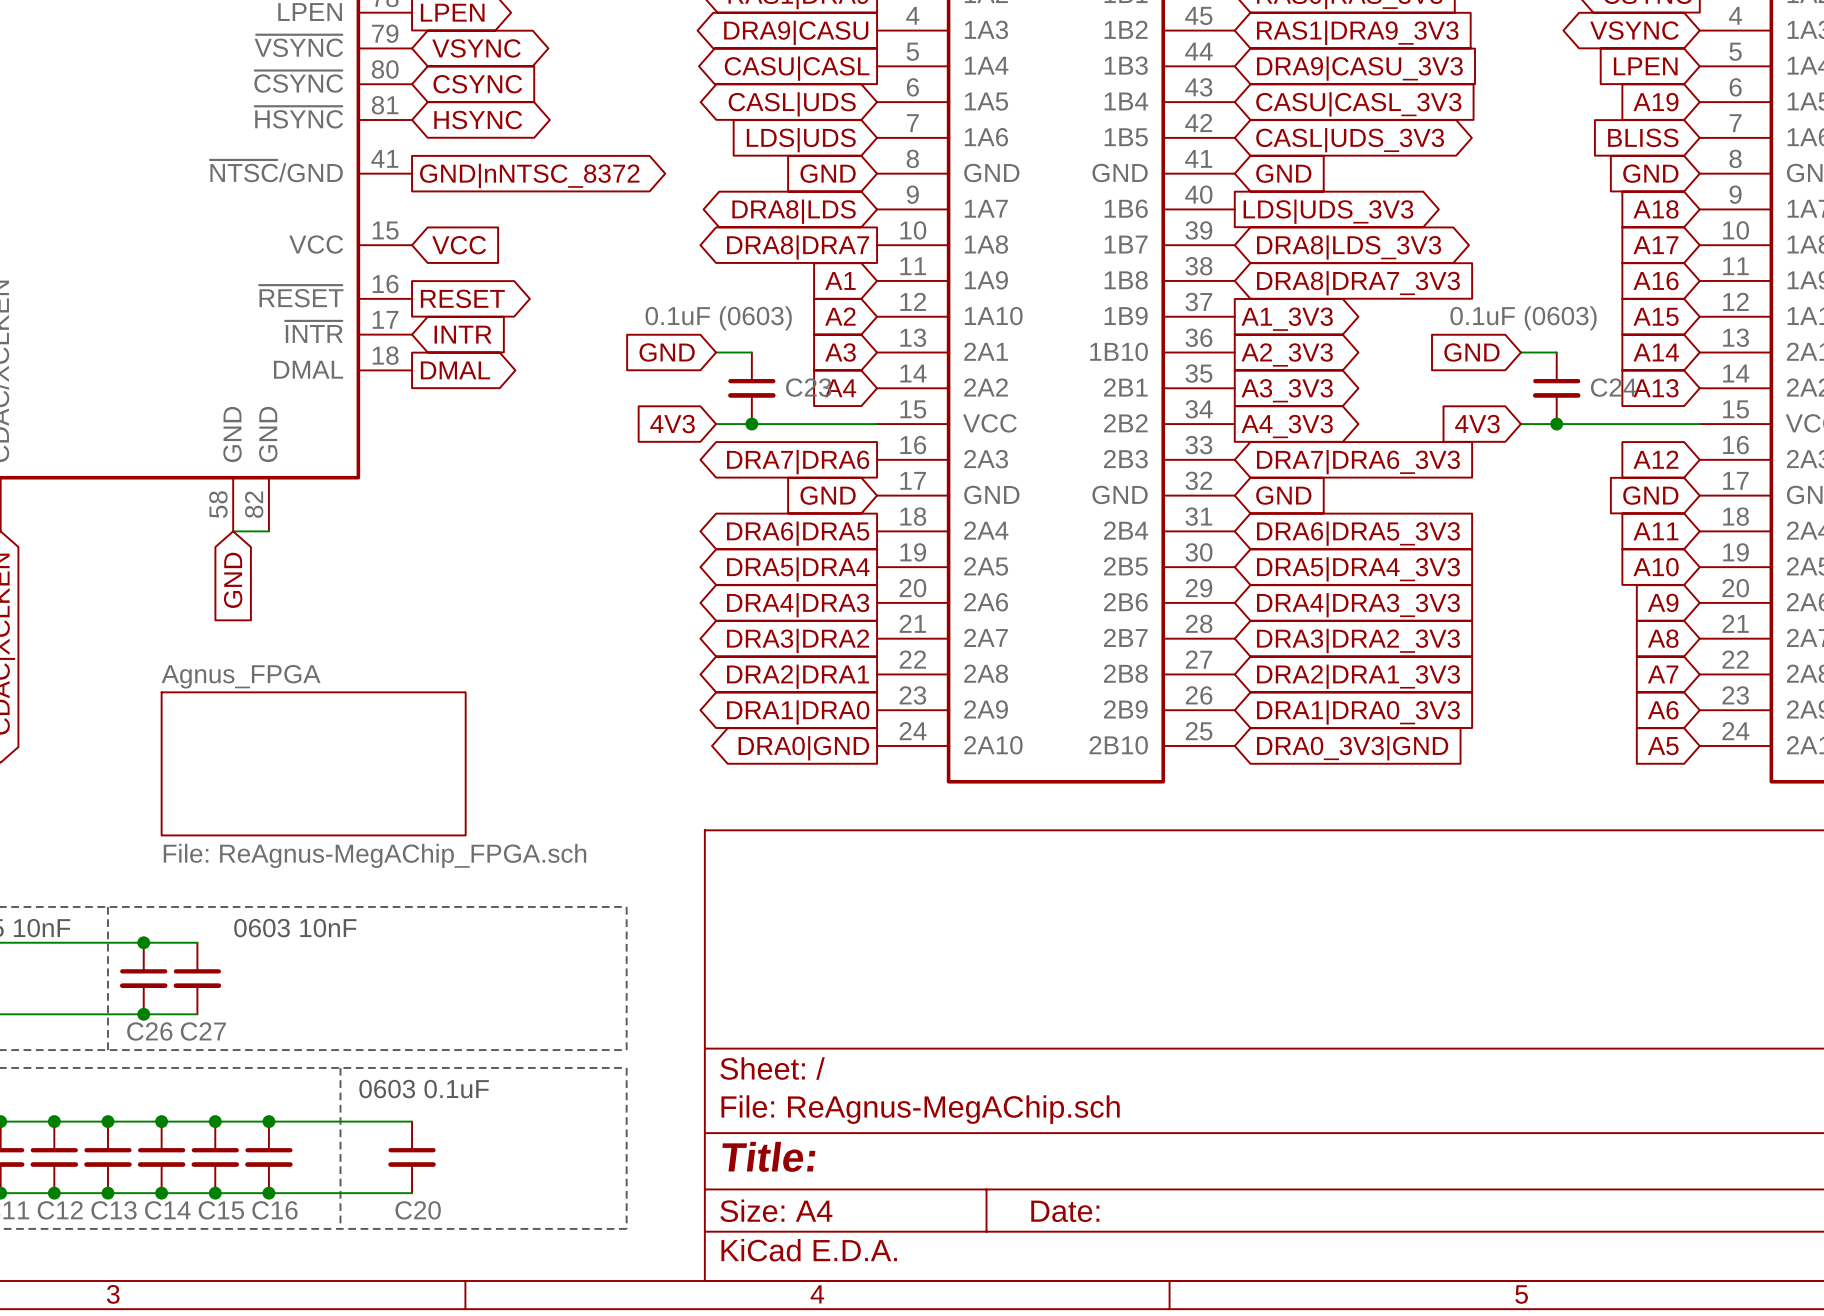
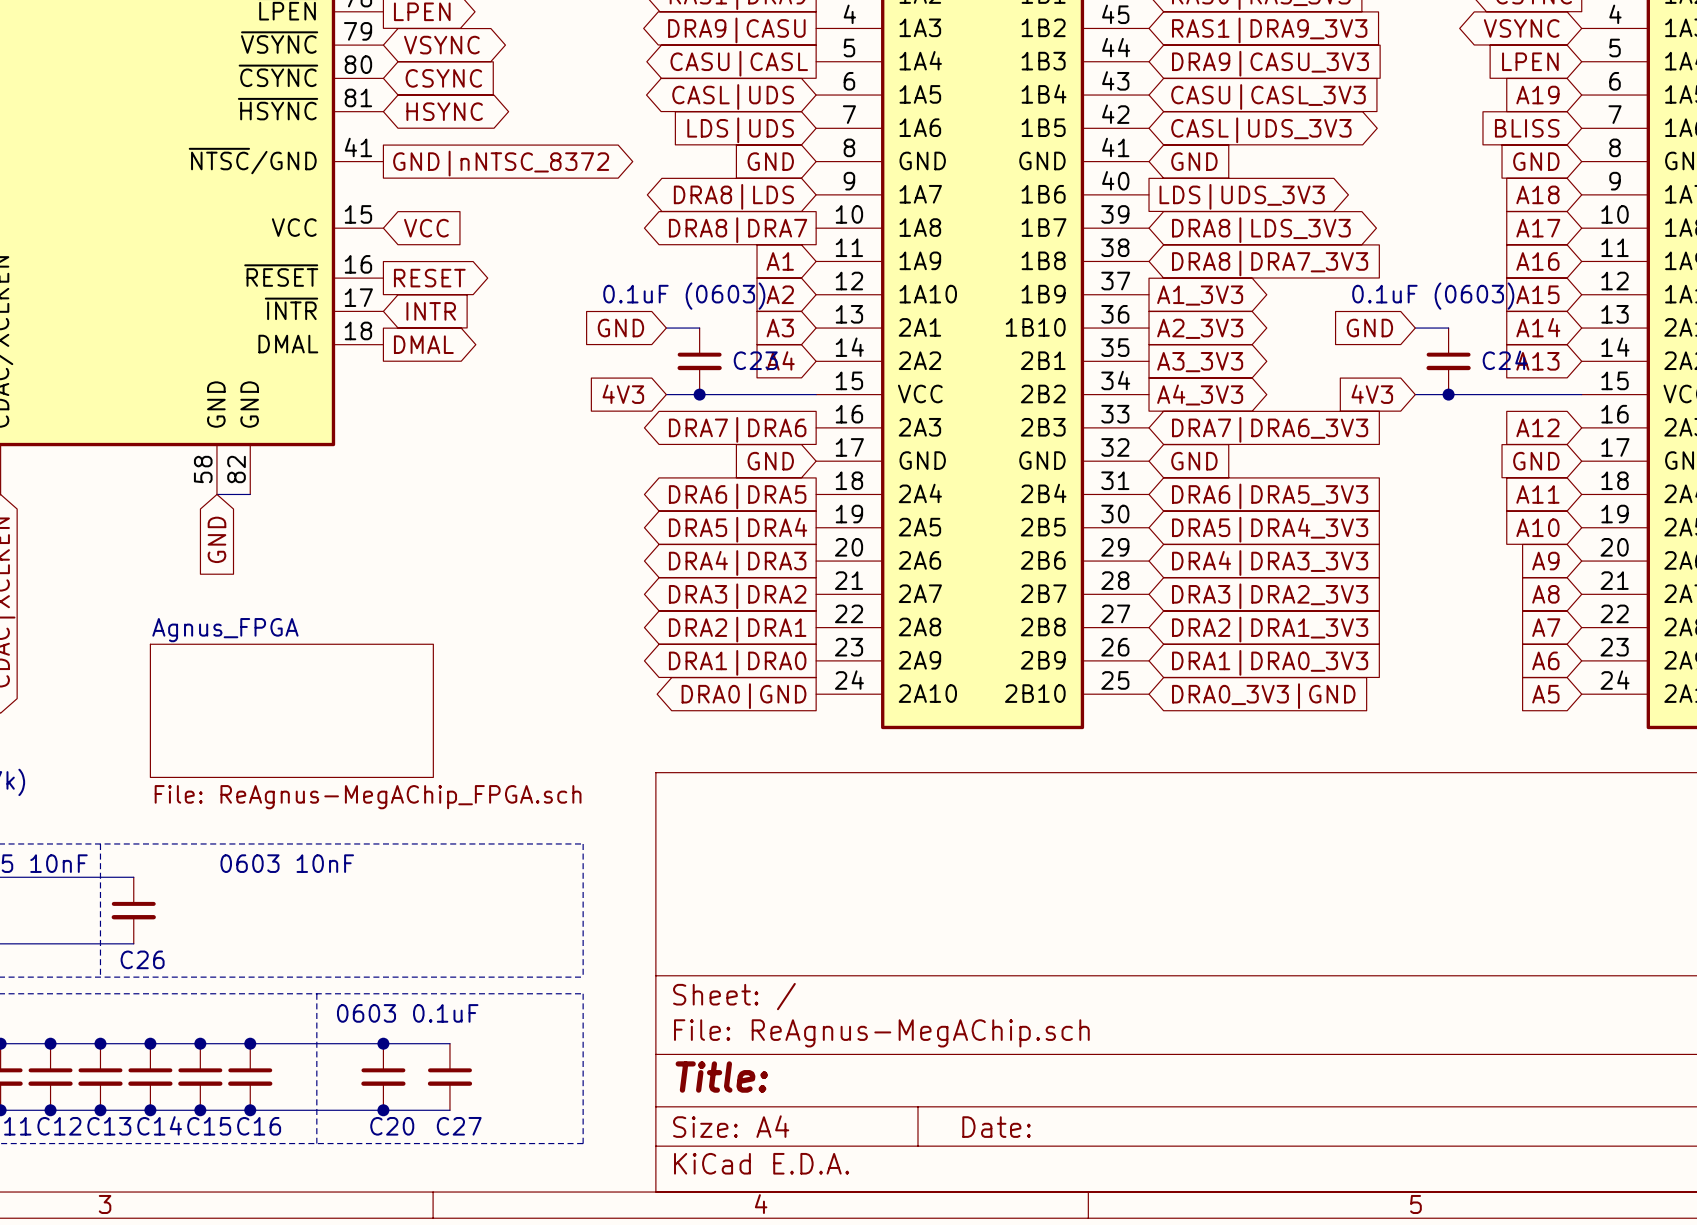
wire: (143, 942) (197, 942) -> none
junction: (143, 942) -> none
C27 position: (197, 978) -> (449, 1076)
wire: (143, 1014) (197, 1014) -> none
junction: (143, 1014) -> none
wire: none -> (383, 1043) (449, 1043)
junction: none -> (383, 1043)
wire: none -> (383, 1110) (449, 1110)
junction: none -> (383, 1110)

